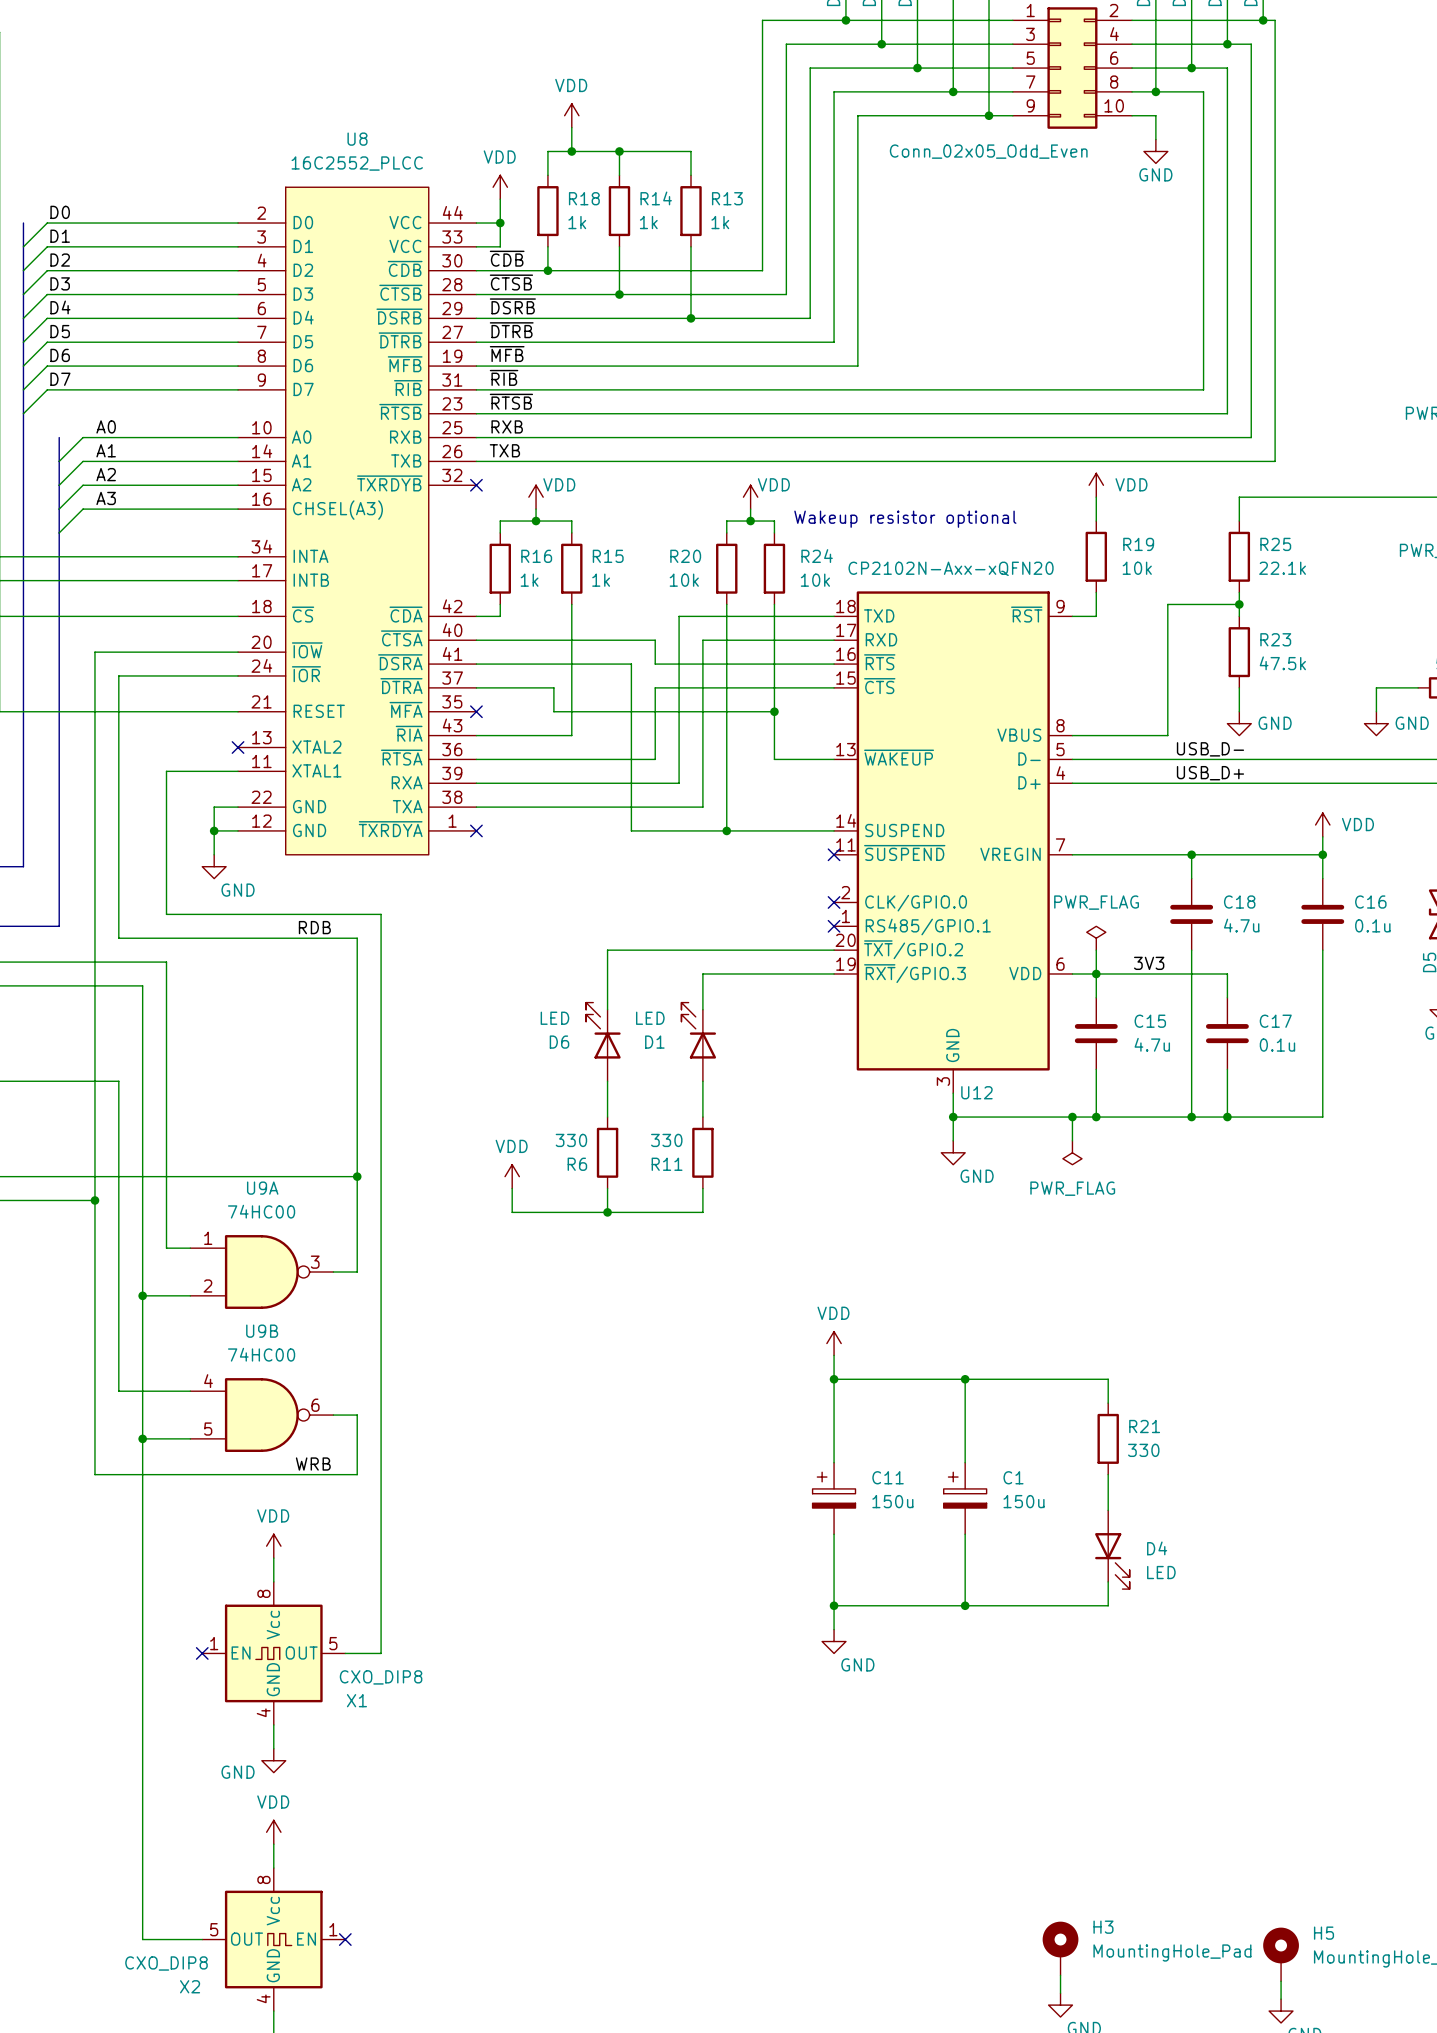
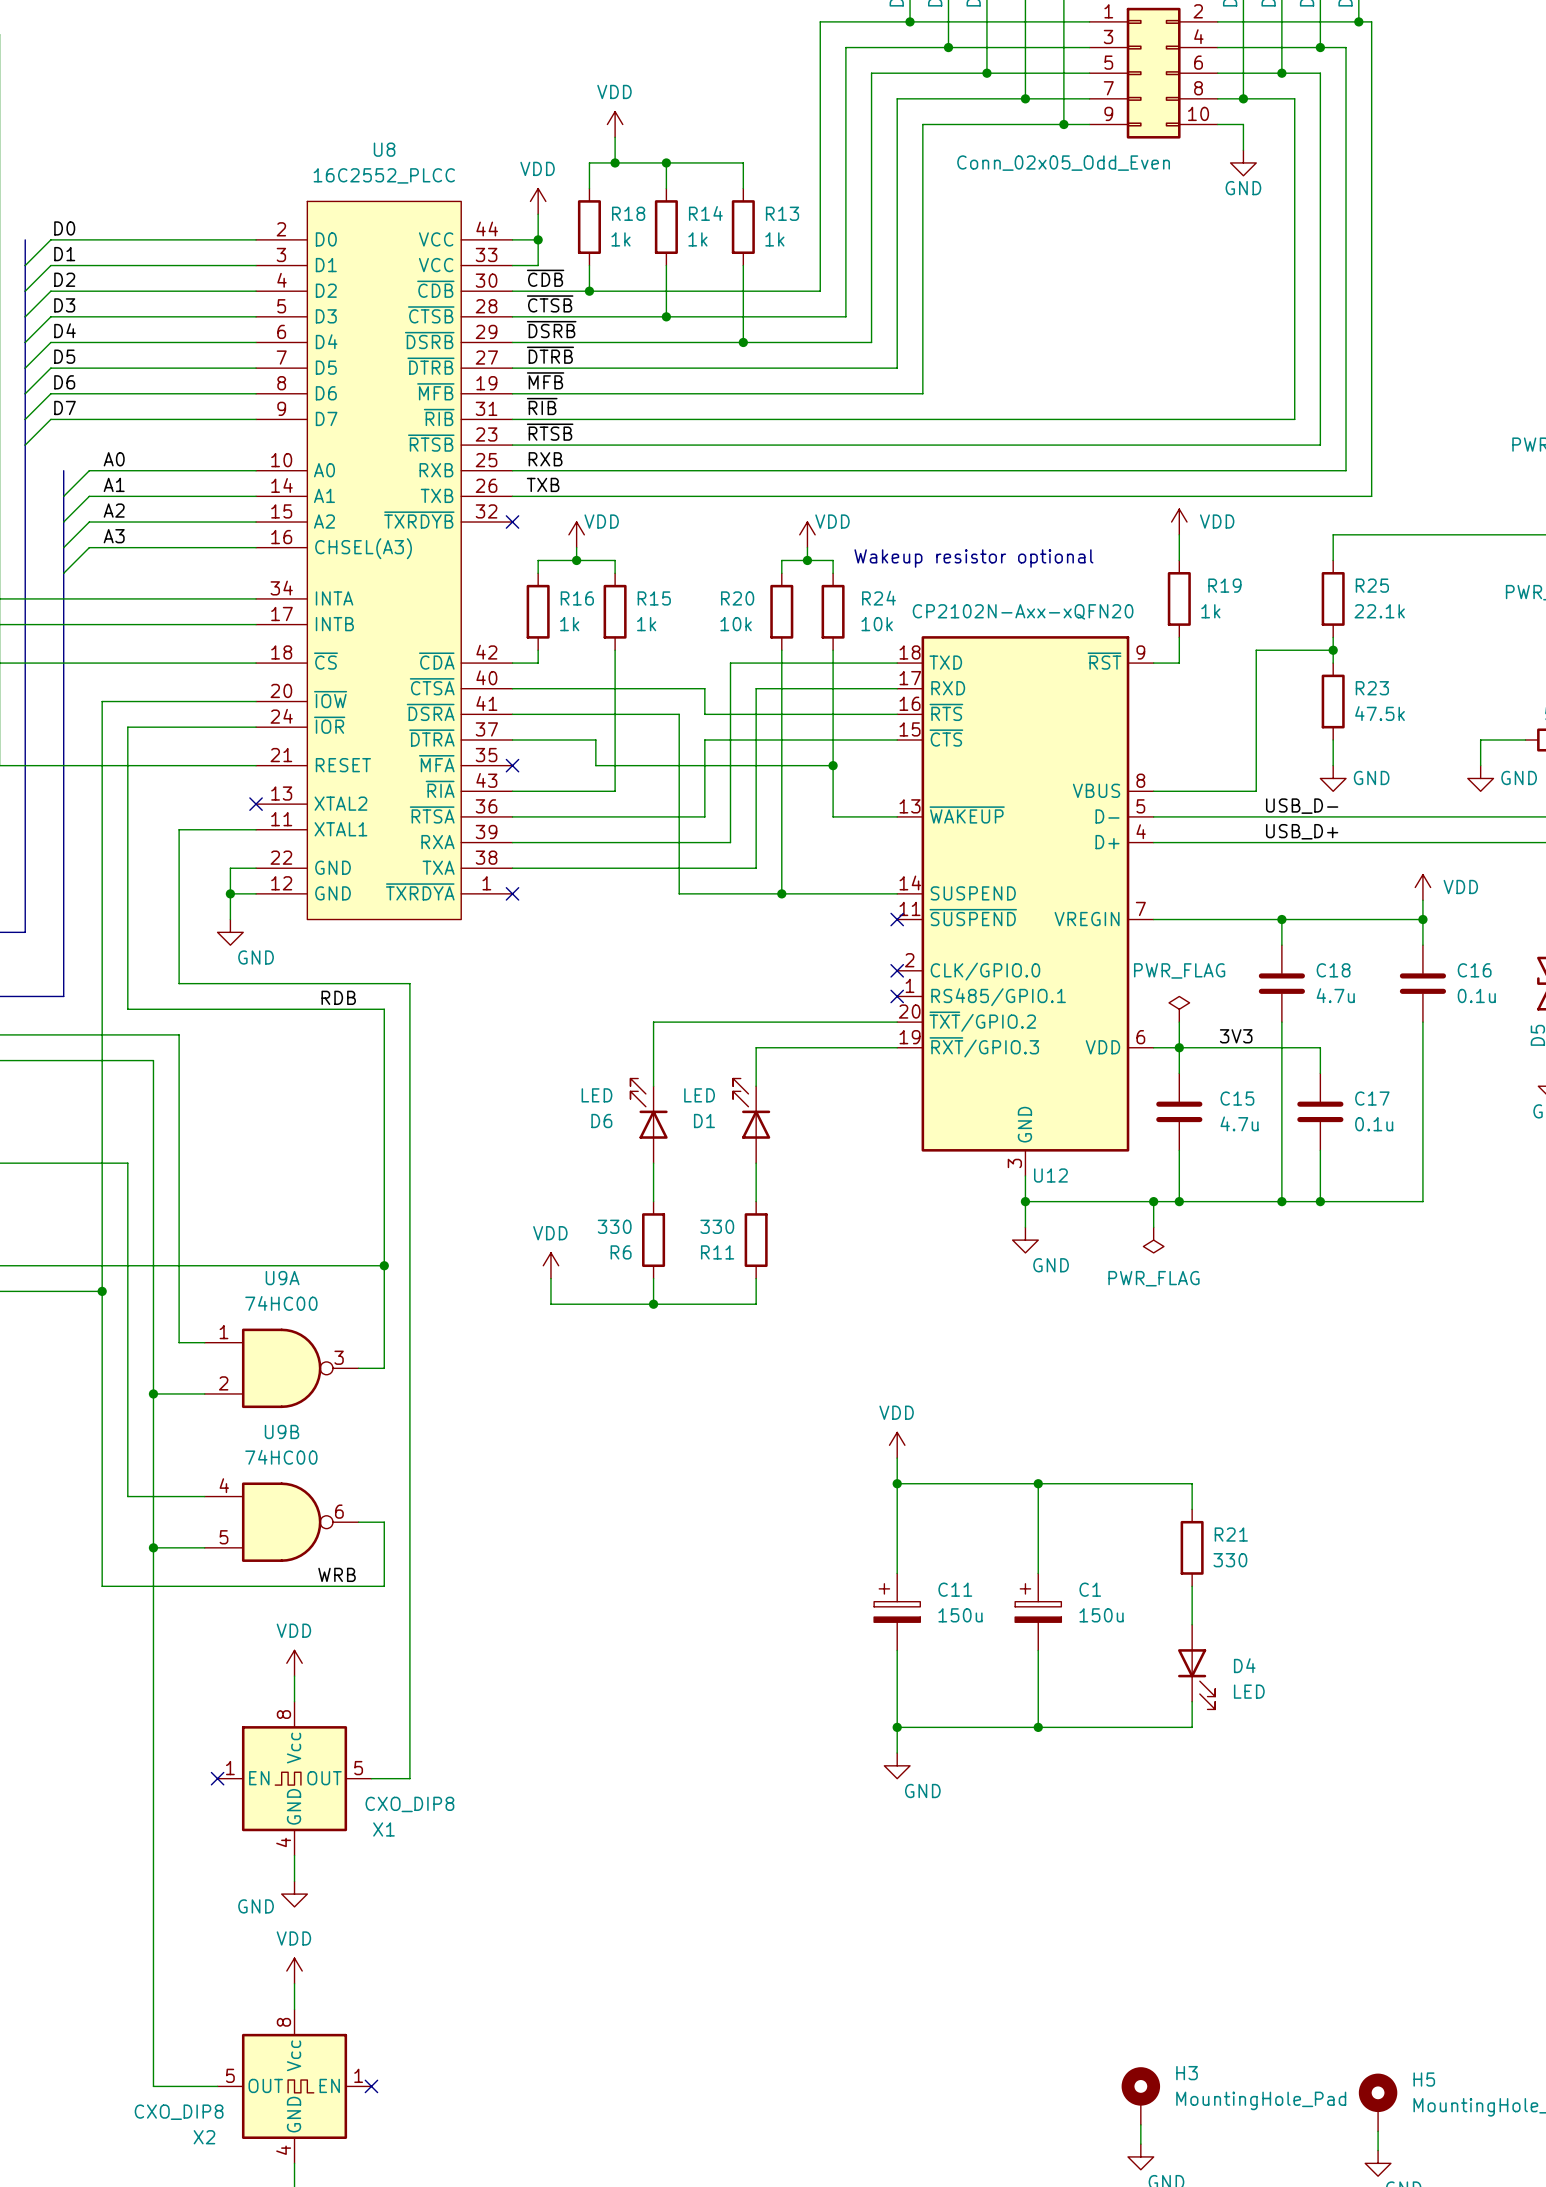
R19 value: 10k (1137, 568) -> 1k (1210, 611)

